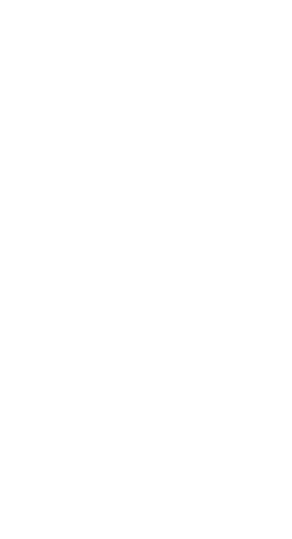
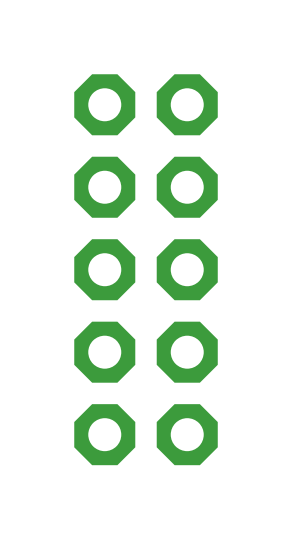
part: none -> (146, 269)

